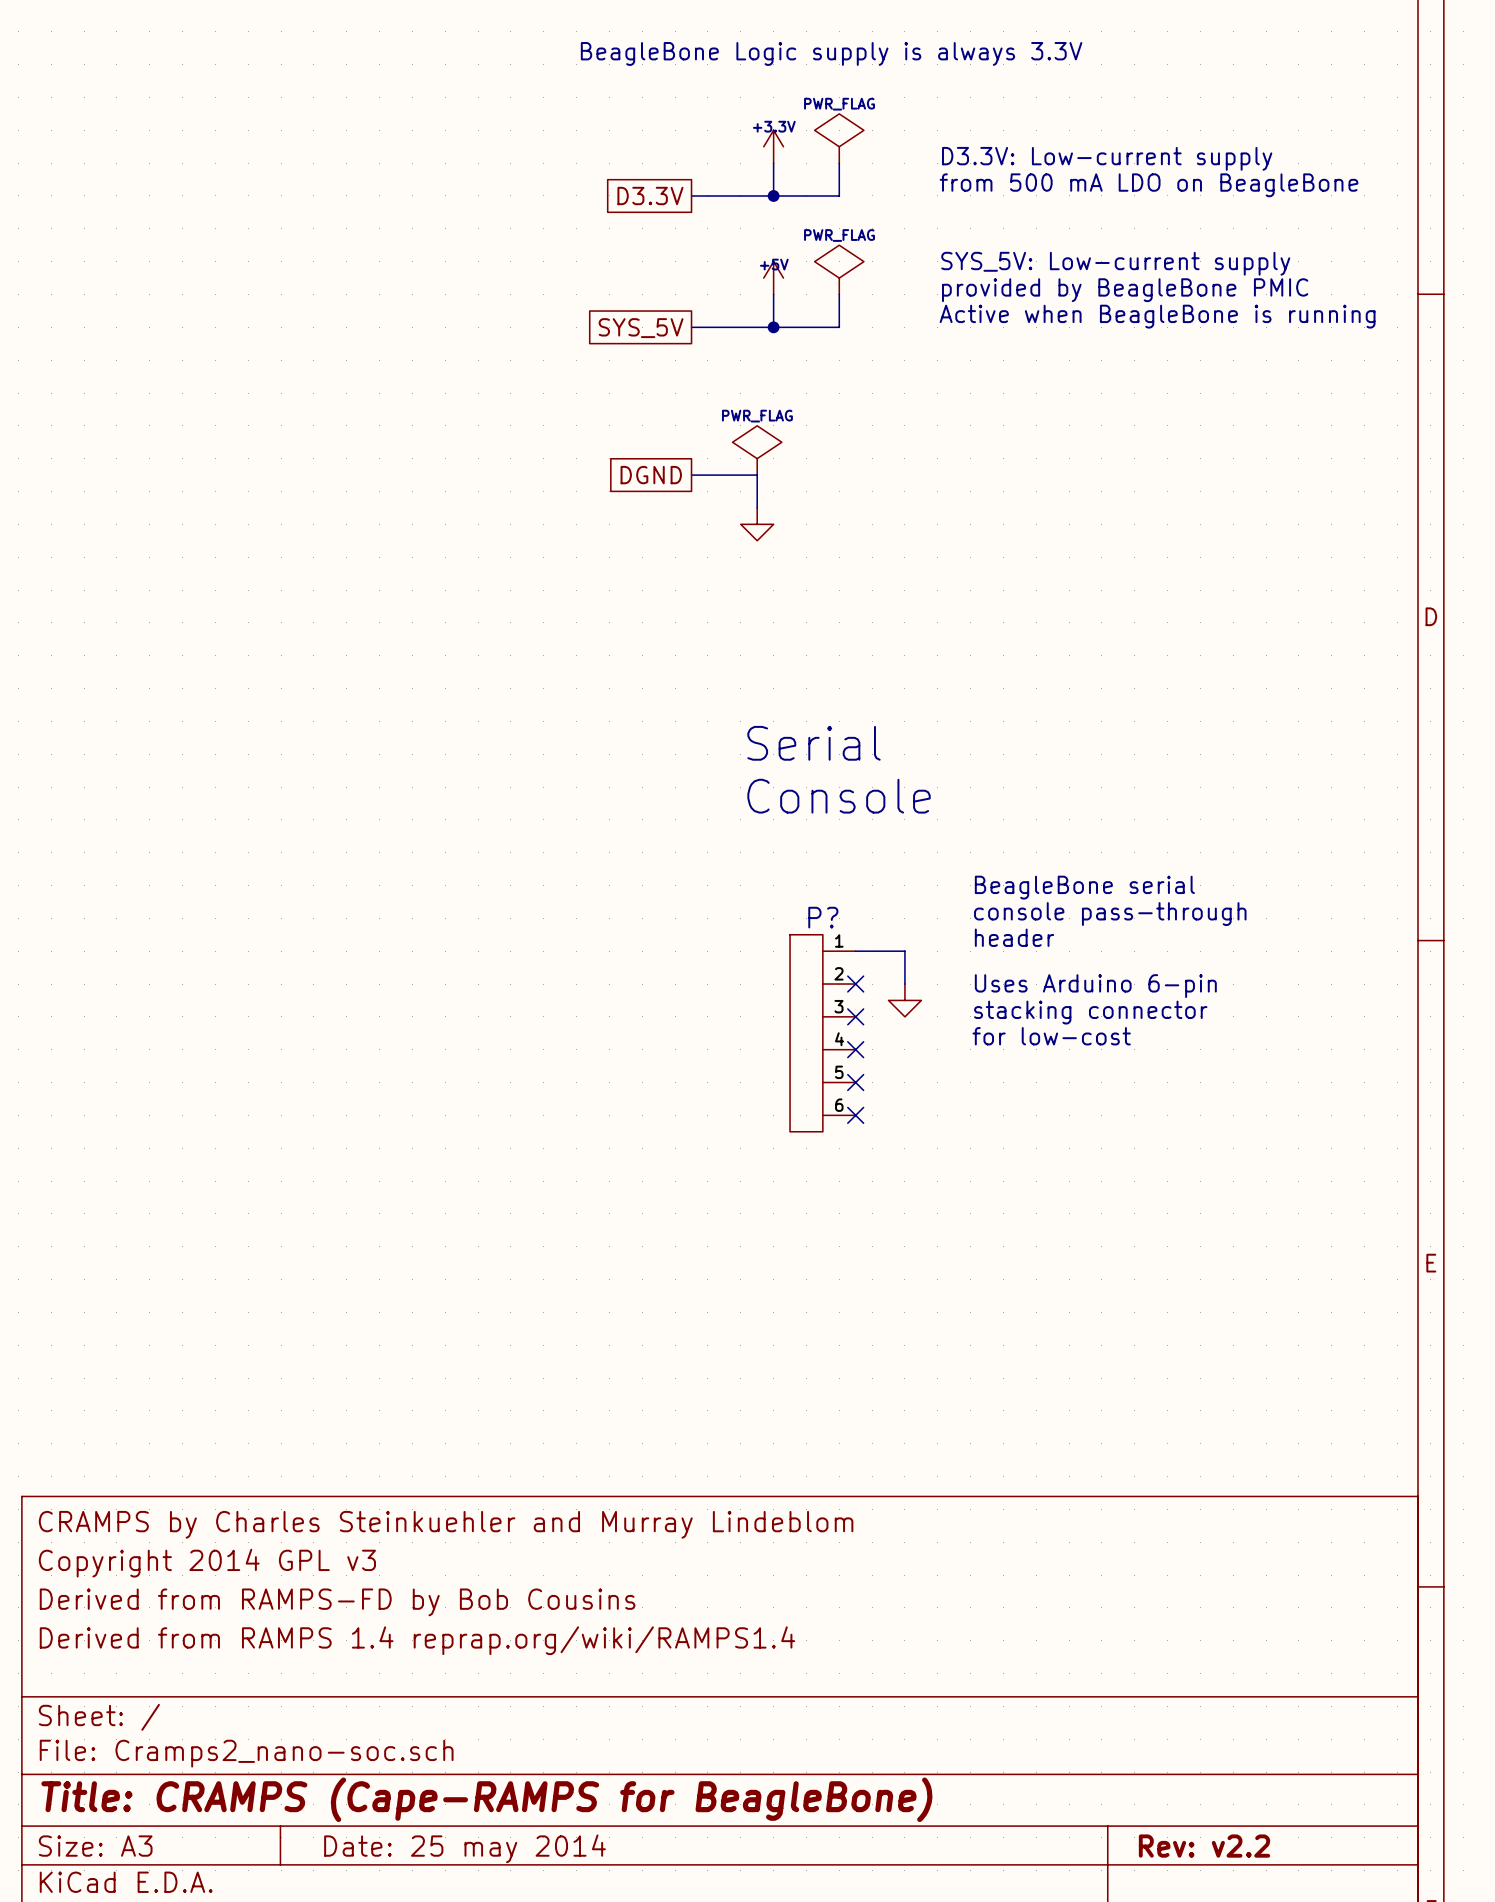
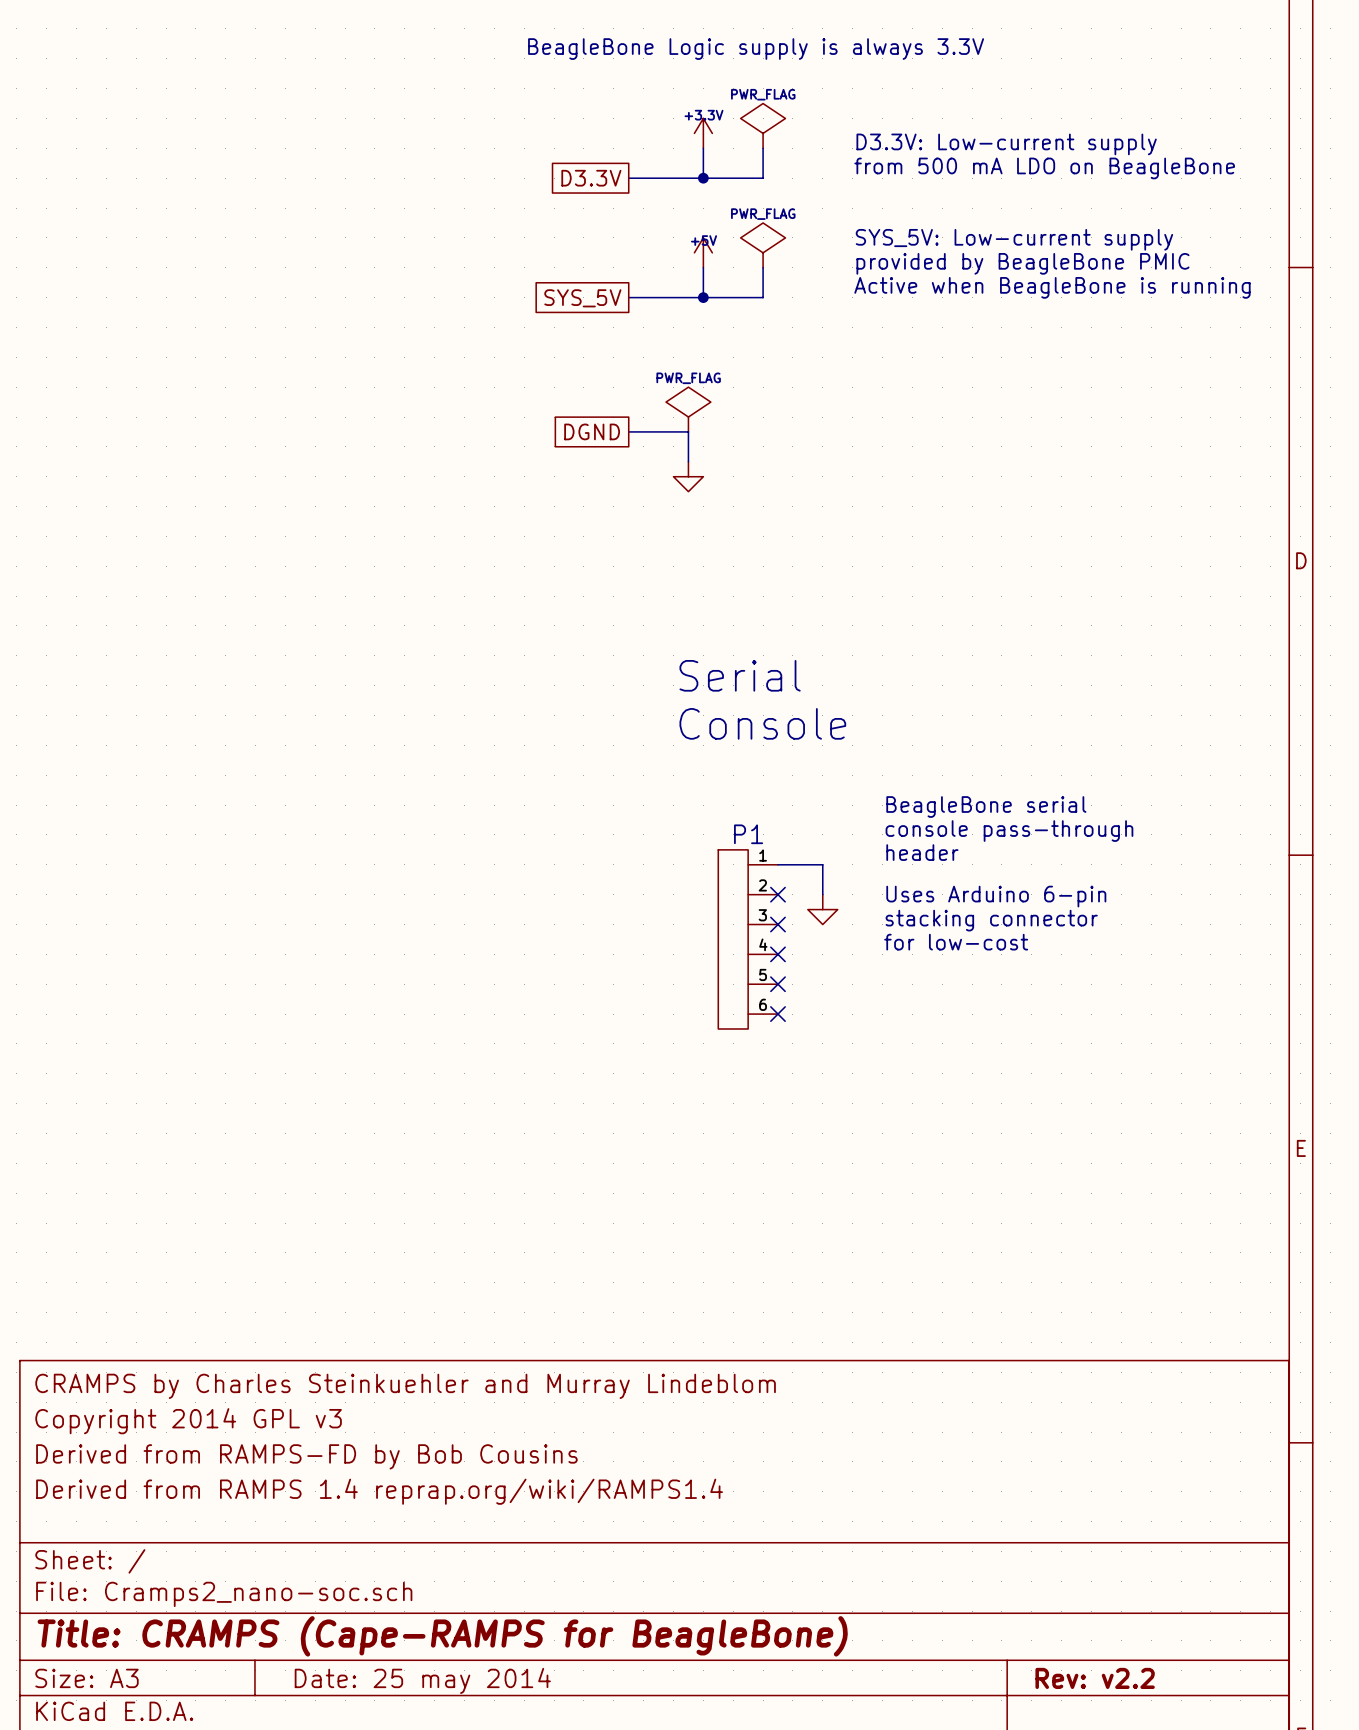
P? name: P? (823, 917) -> P1 (748, 834)

